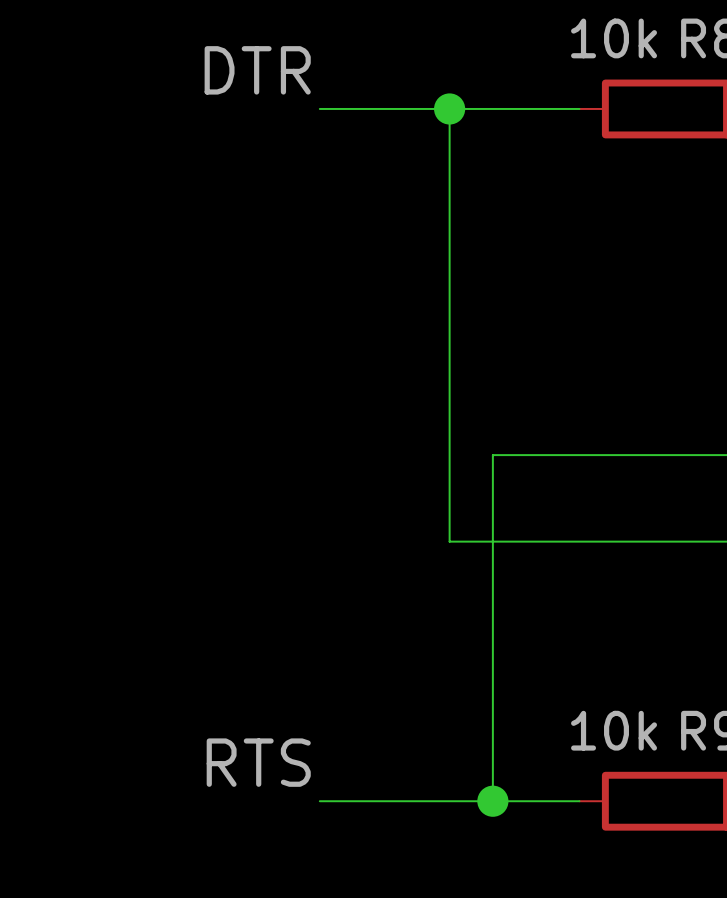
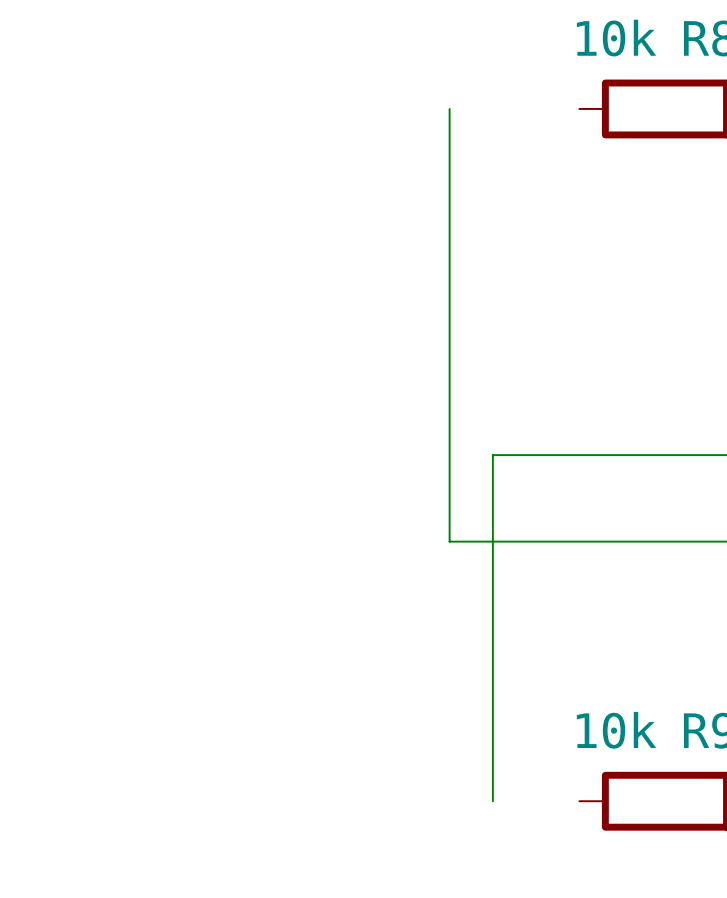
label: DTR (257, 70) -> none
wire: (319, 108) (579, 108) -> none
junction: (449, 108) -> none
label: RTS (258, 762) -> none
wire: (319, 801) (579, 801) -> none
junction: (492, 801) -> none

